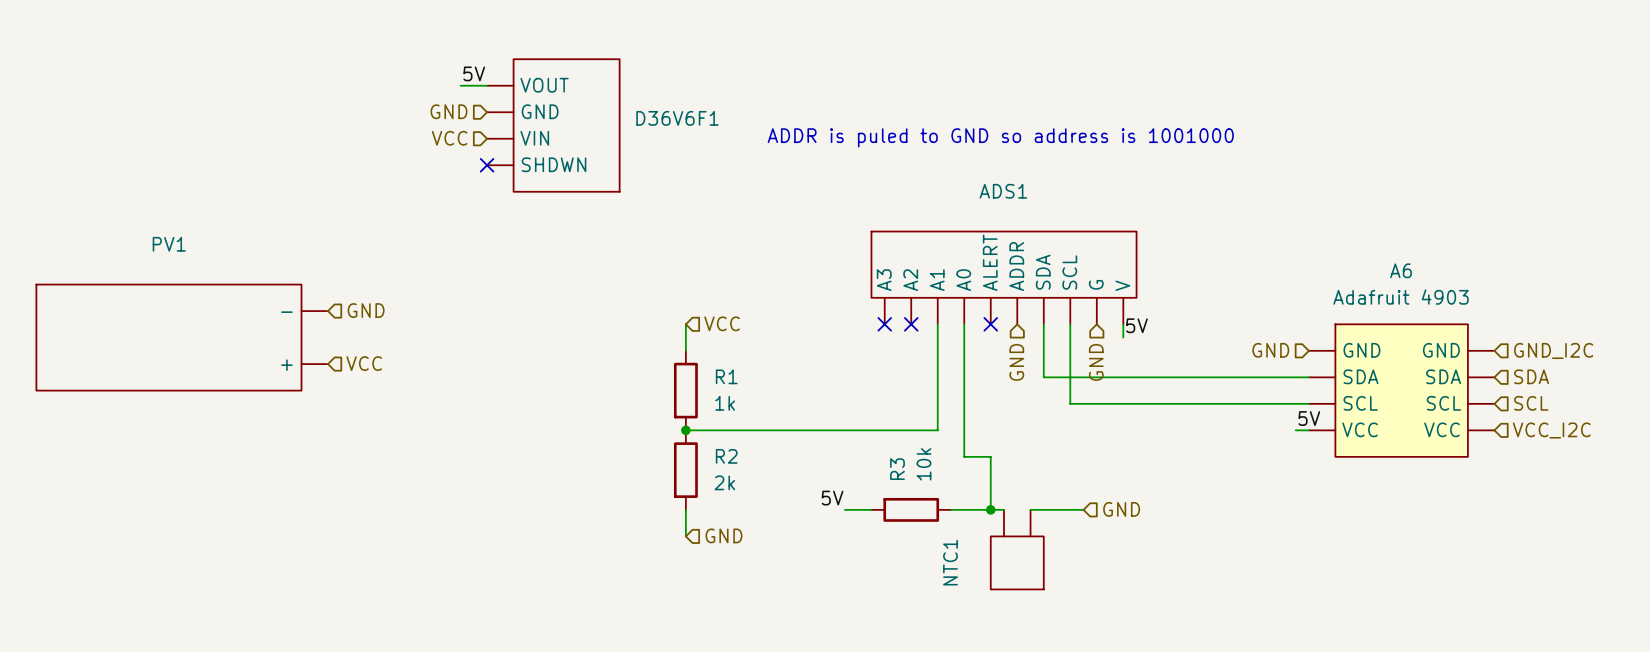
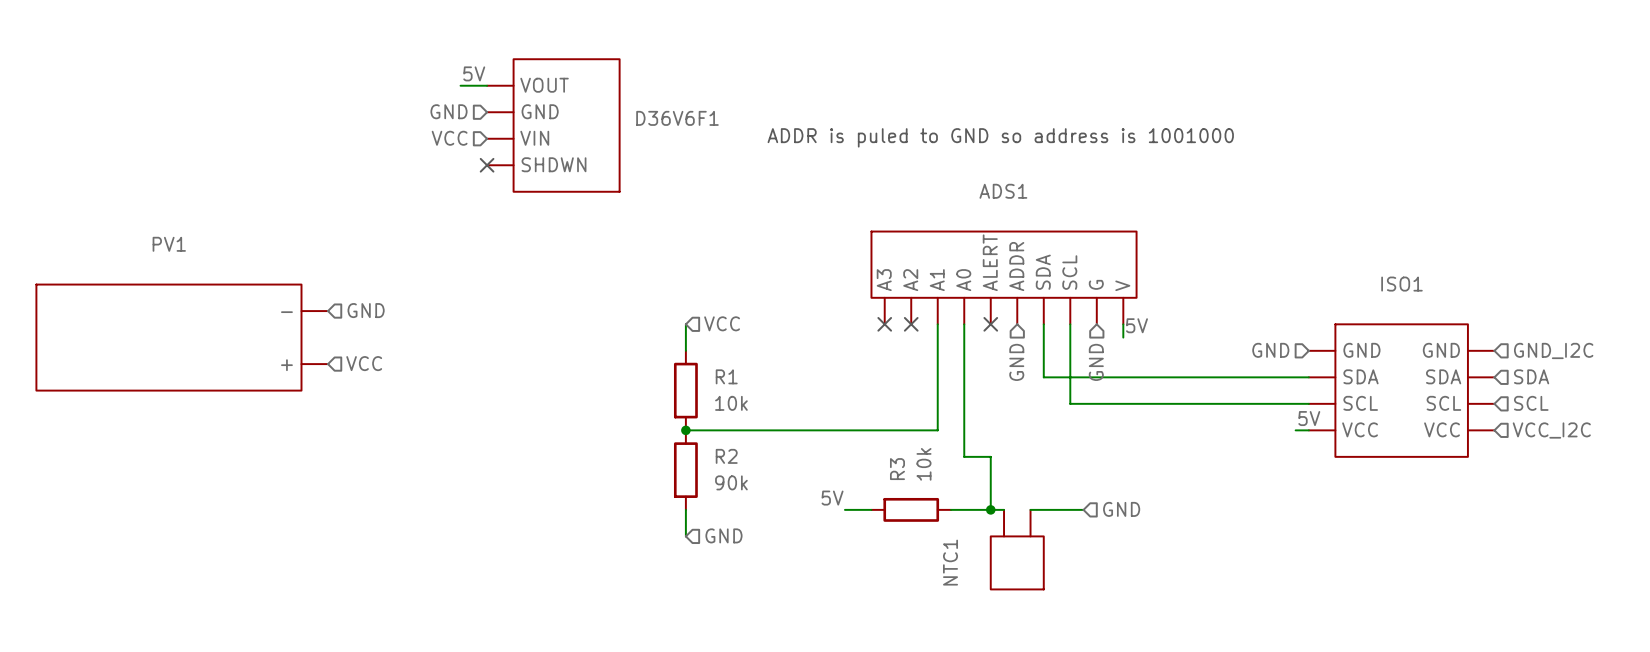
A6: Adafruit 4903 (1401, 390) -> none
ISO1: none -> (1401, 390)
R1 value: 1k (725, 403) -> 10k (731, 403)
R2 value: 2k (724, 482) -> 90k (731, 482)

